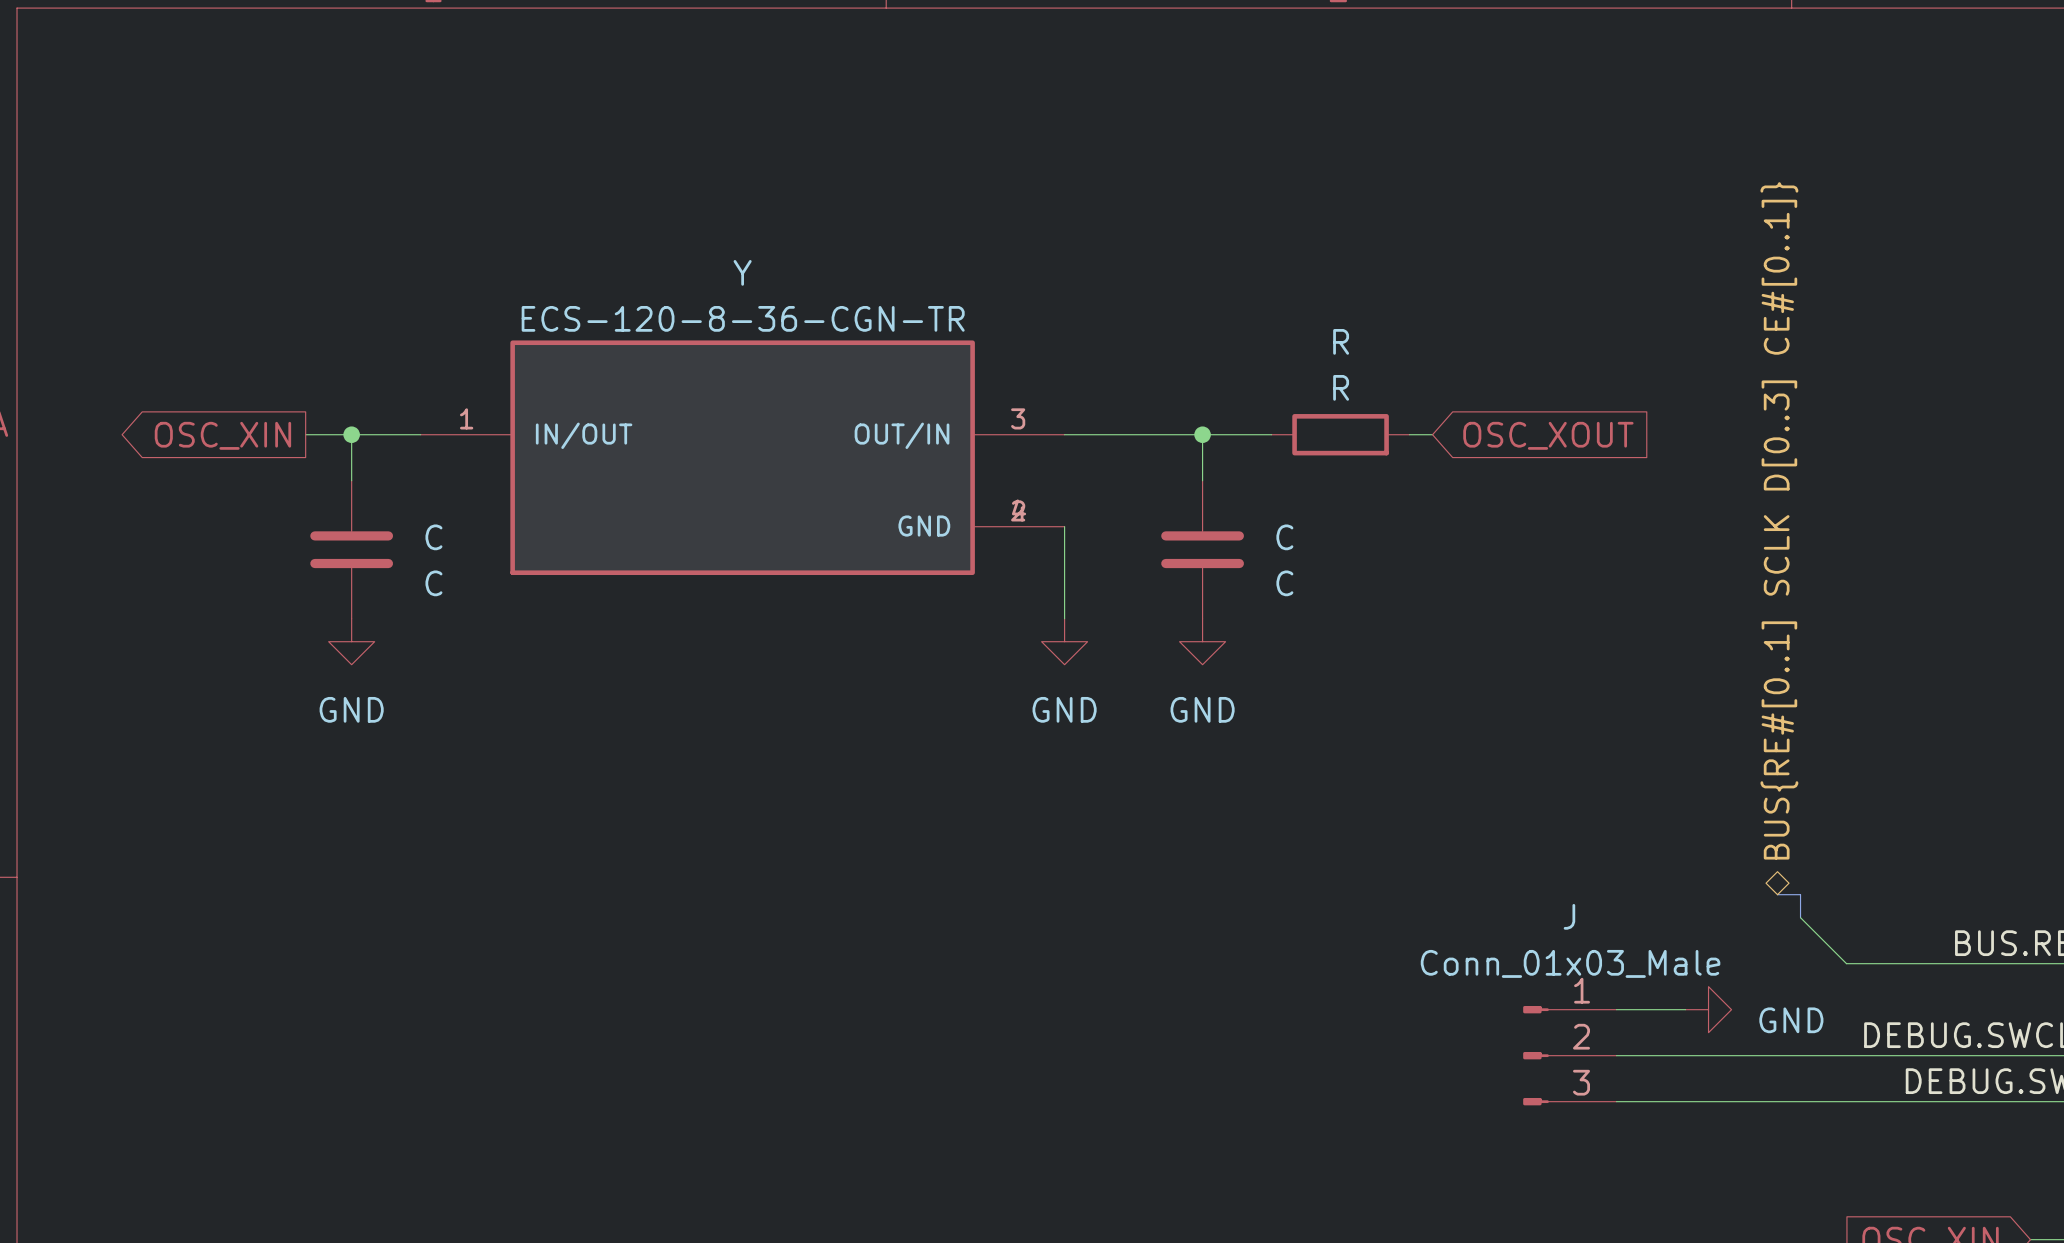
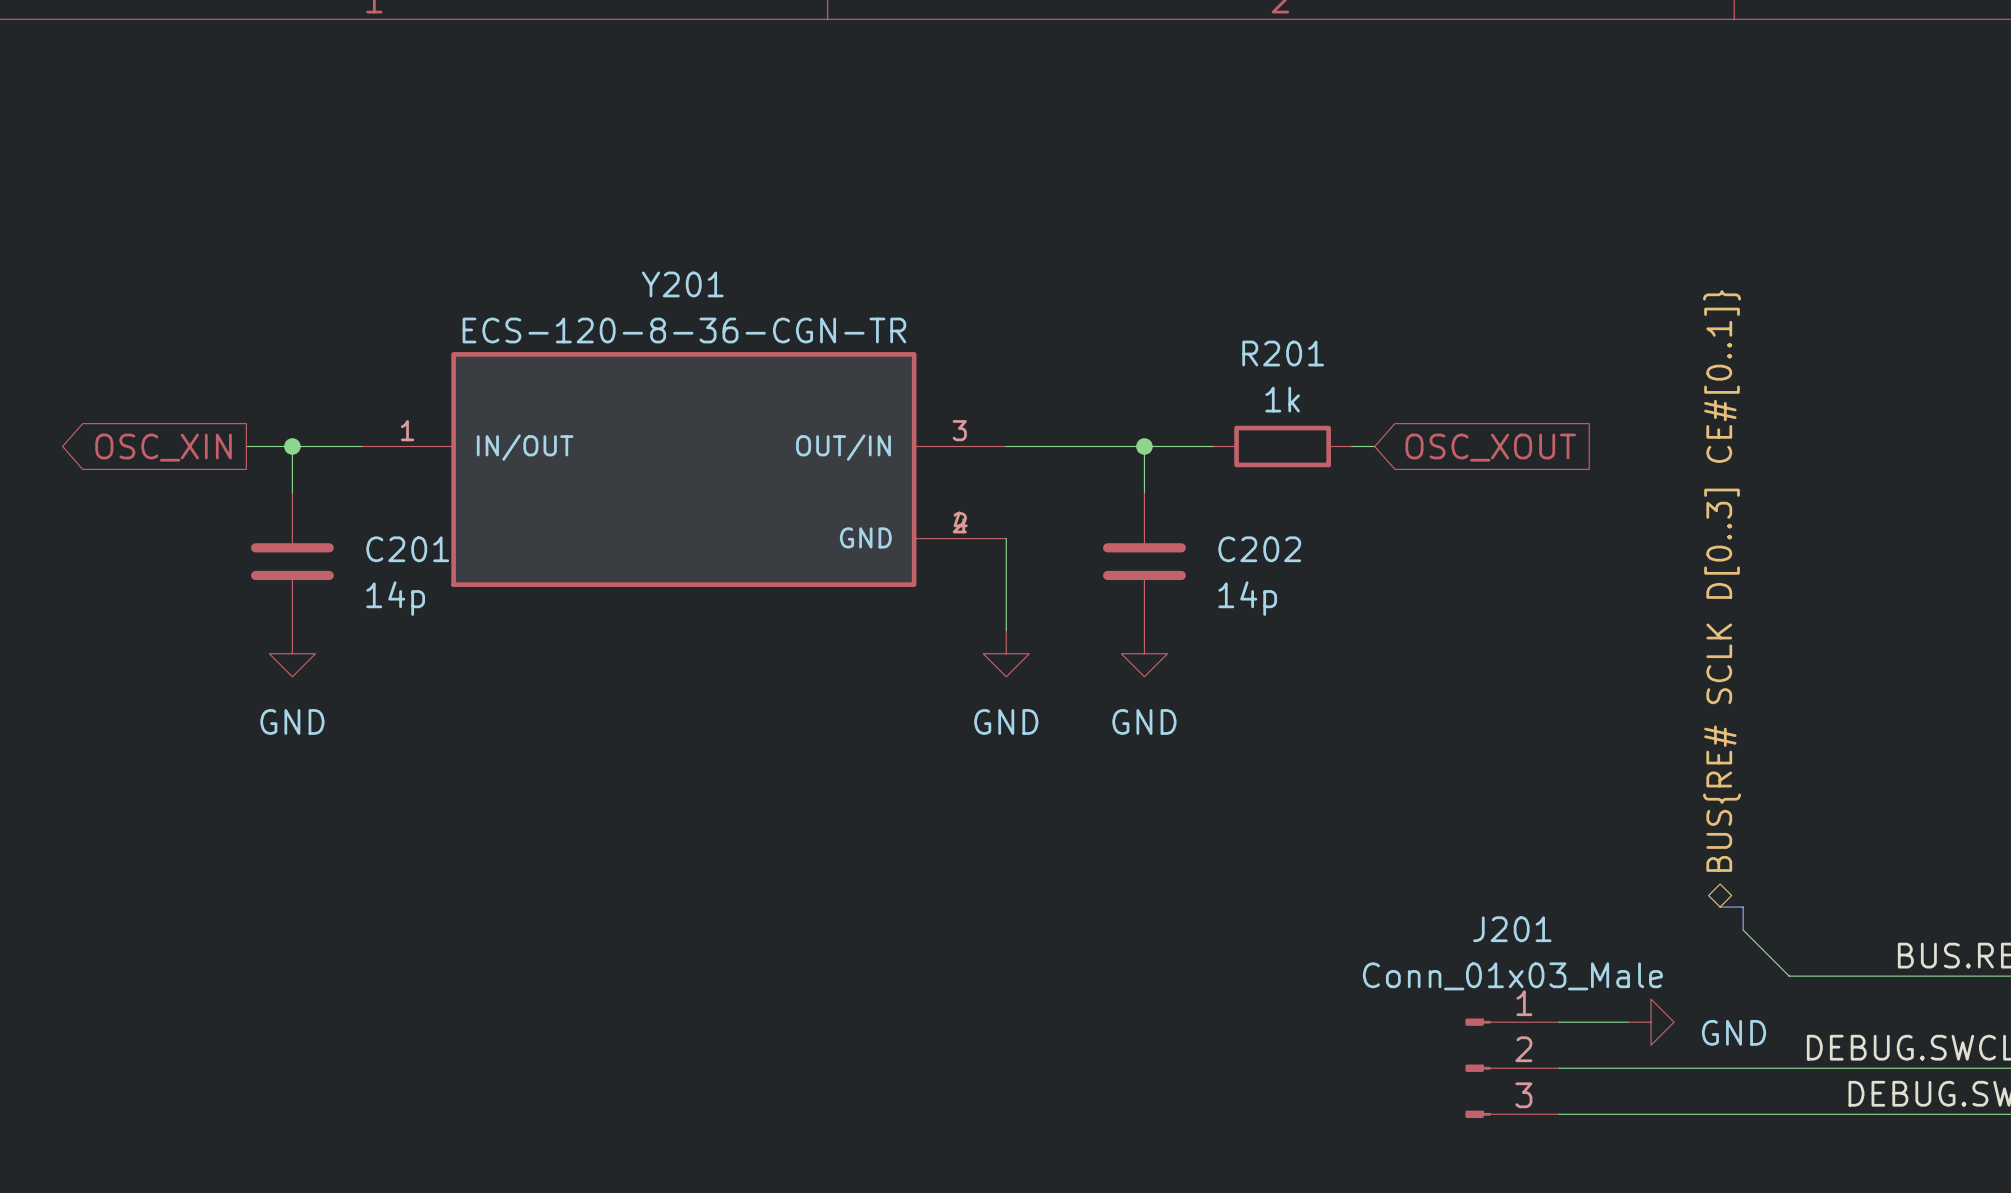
Y name: Y (742, 272) -> Y201 (682, 284)
R name: R (1341, 341) -> R201 (1283, 353)
R value: R (1341, 387) -> 1k (1282, 399)
hierarchical label: BUS{RE#[0..1] SCLK D[0..3] CE#[0..1]} (1779, 520) -> BUS{RE# SCLK D[0..3] CE#[0..1]} (1722, 581)
C name: C (433, 537) -> C201 (407, 549)
C name: C (1284, 537) -> C202 (1259, 549)
C value: C (433, 583) -> 14p (395, 598)
C value: C (1284, 583) -> 14p (1247, 598)
J name: J (1569, 916) -> J201 (1512, 929)

